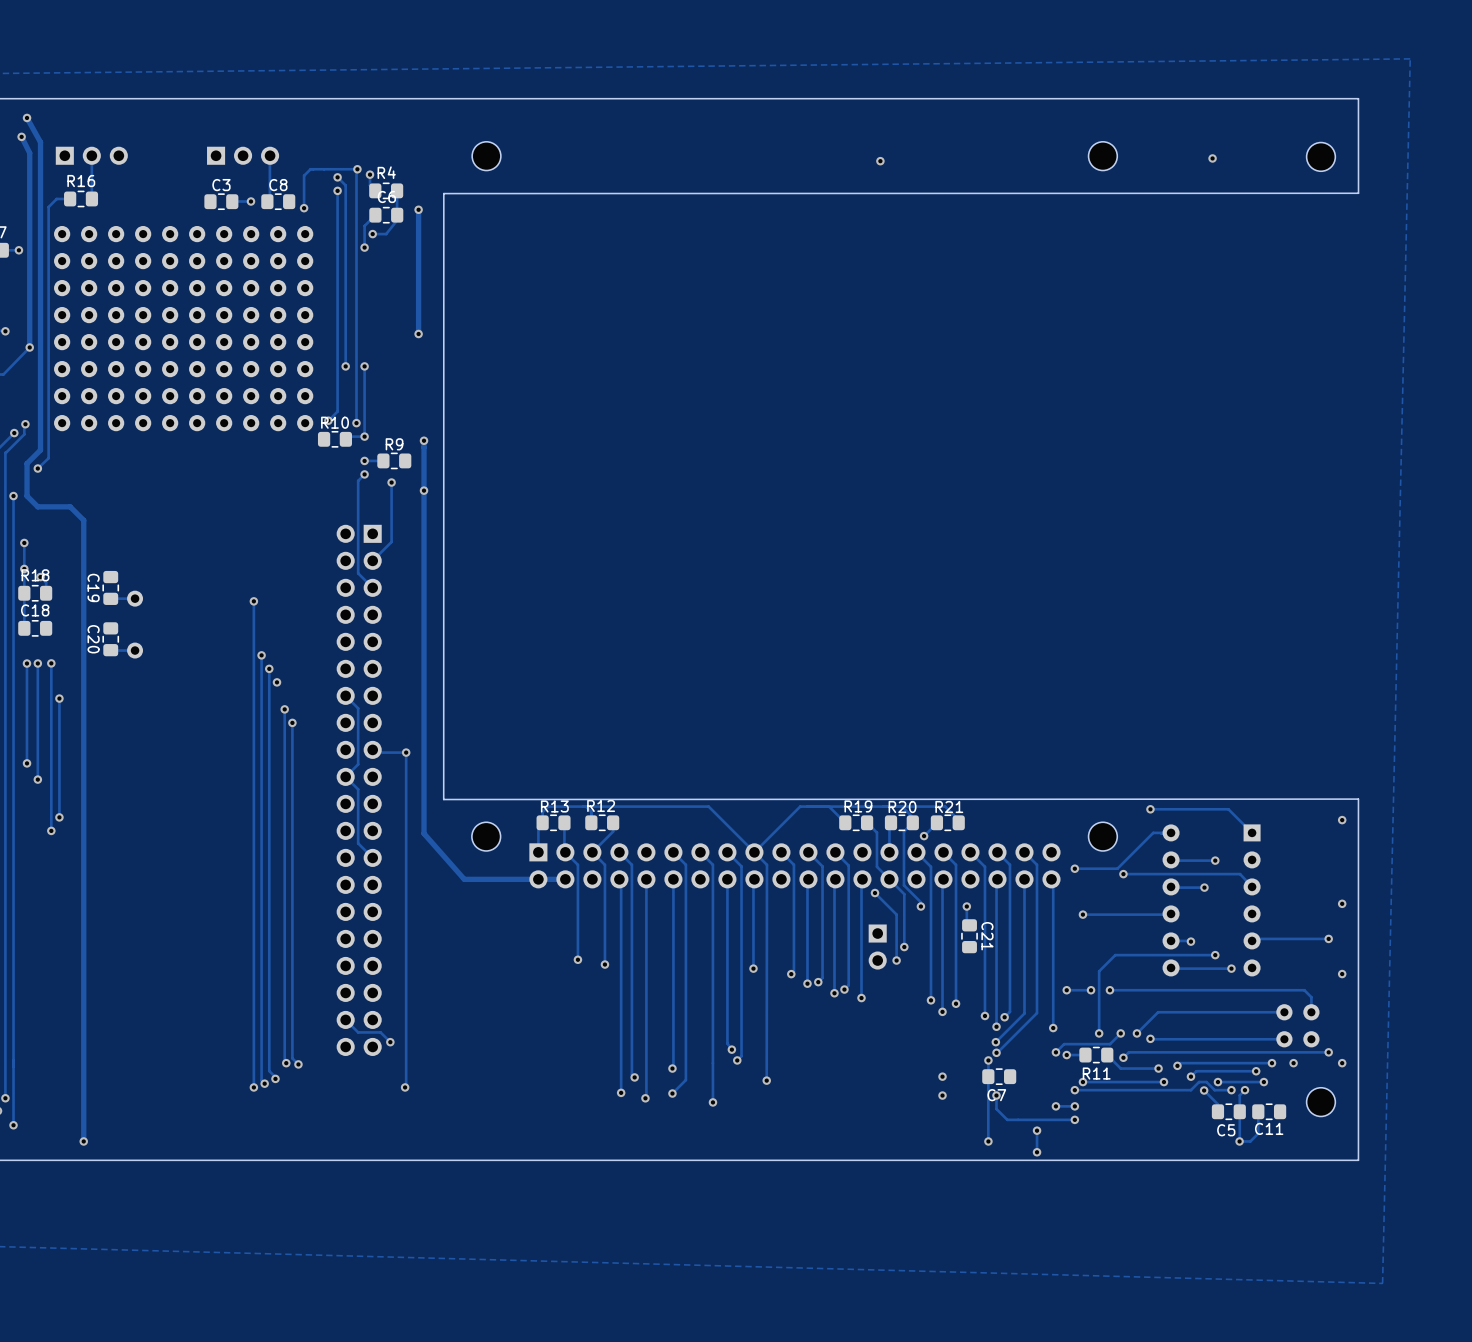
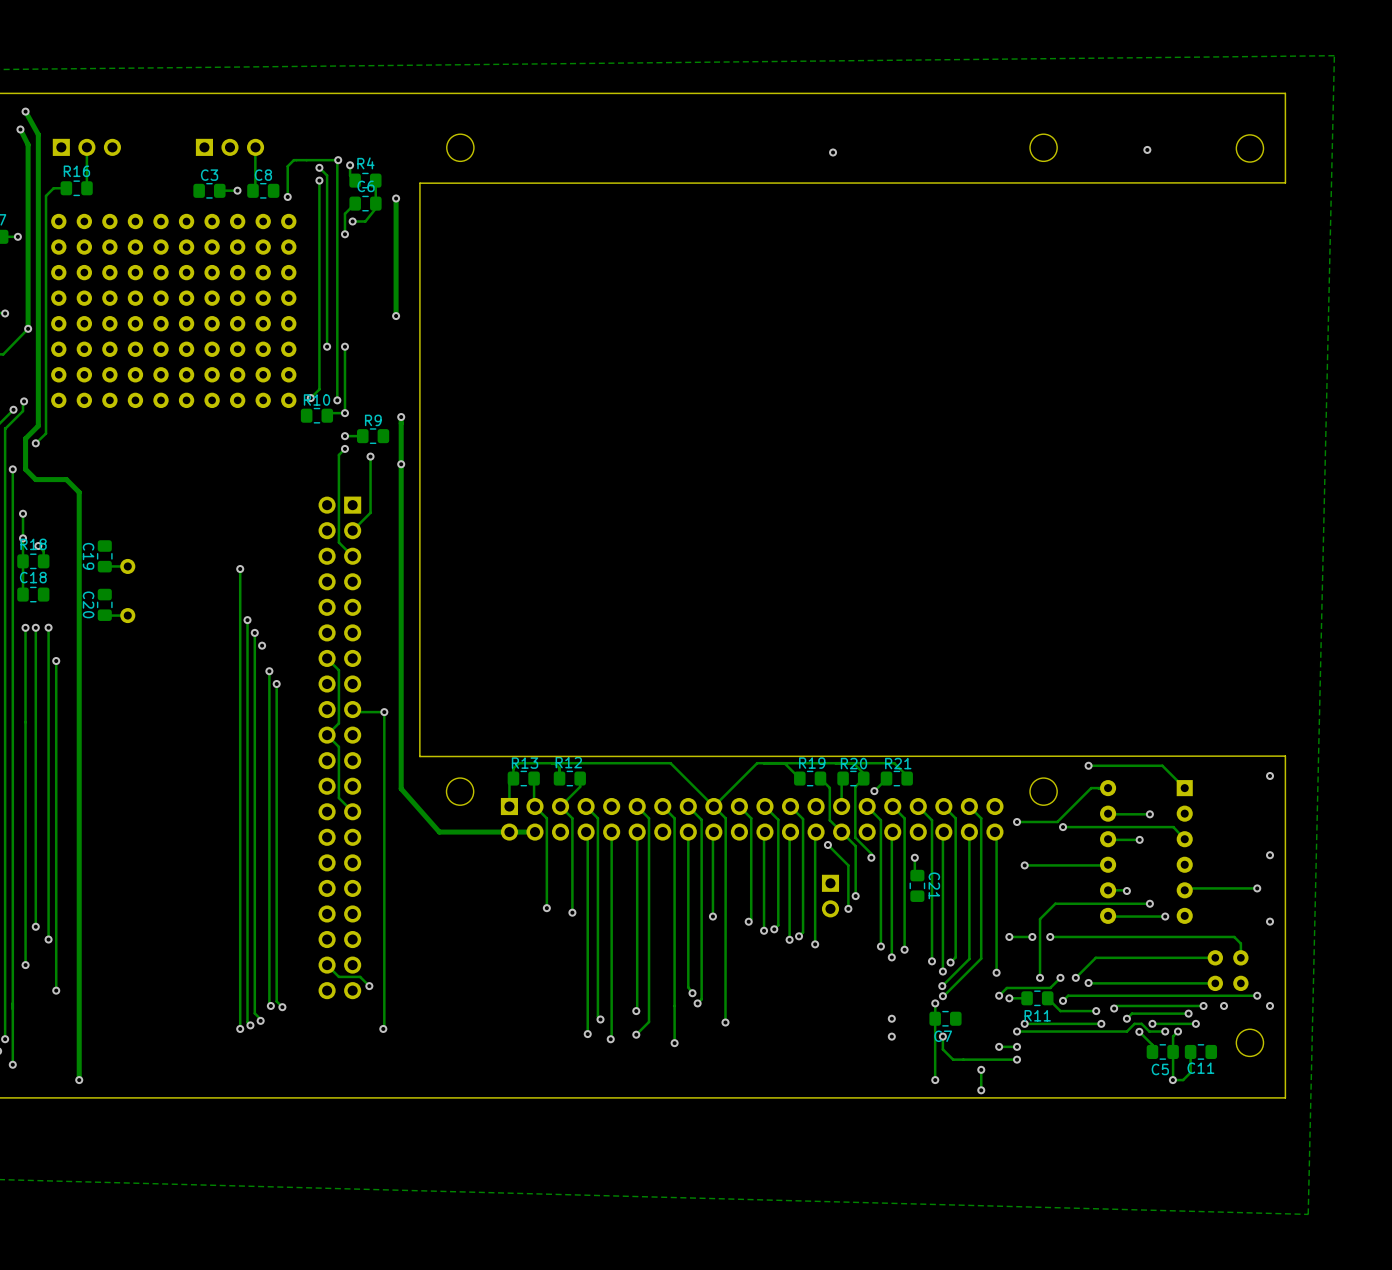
track: none -> (25, 722) (25, 965)
via: (27, 763) -> none
track: none -> (35, 737) (35, 926)
via: (37, 779) -> none
track: none -> (56, 773) (56, 990)
via: (59, 817) -> none
track: none -> (48, 786) (48, 939)
via: (51, 830) -> none
via: none -> (35, 926)
via: none -> (48, 939)
via: none -> (25, 965)
via: none -> (56, 990)

